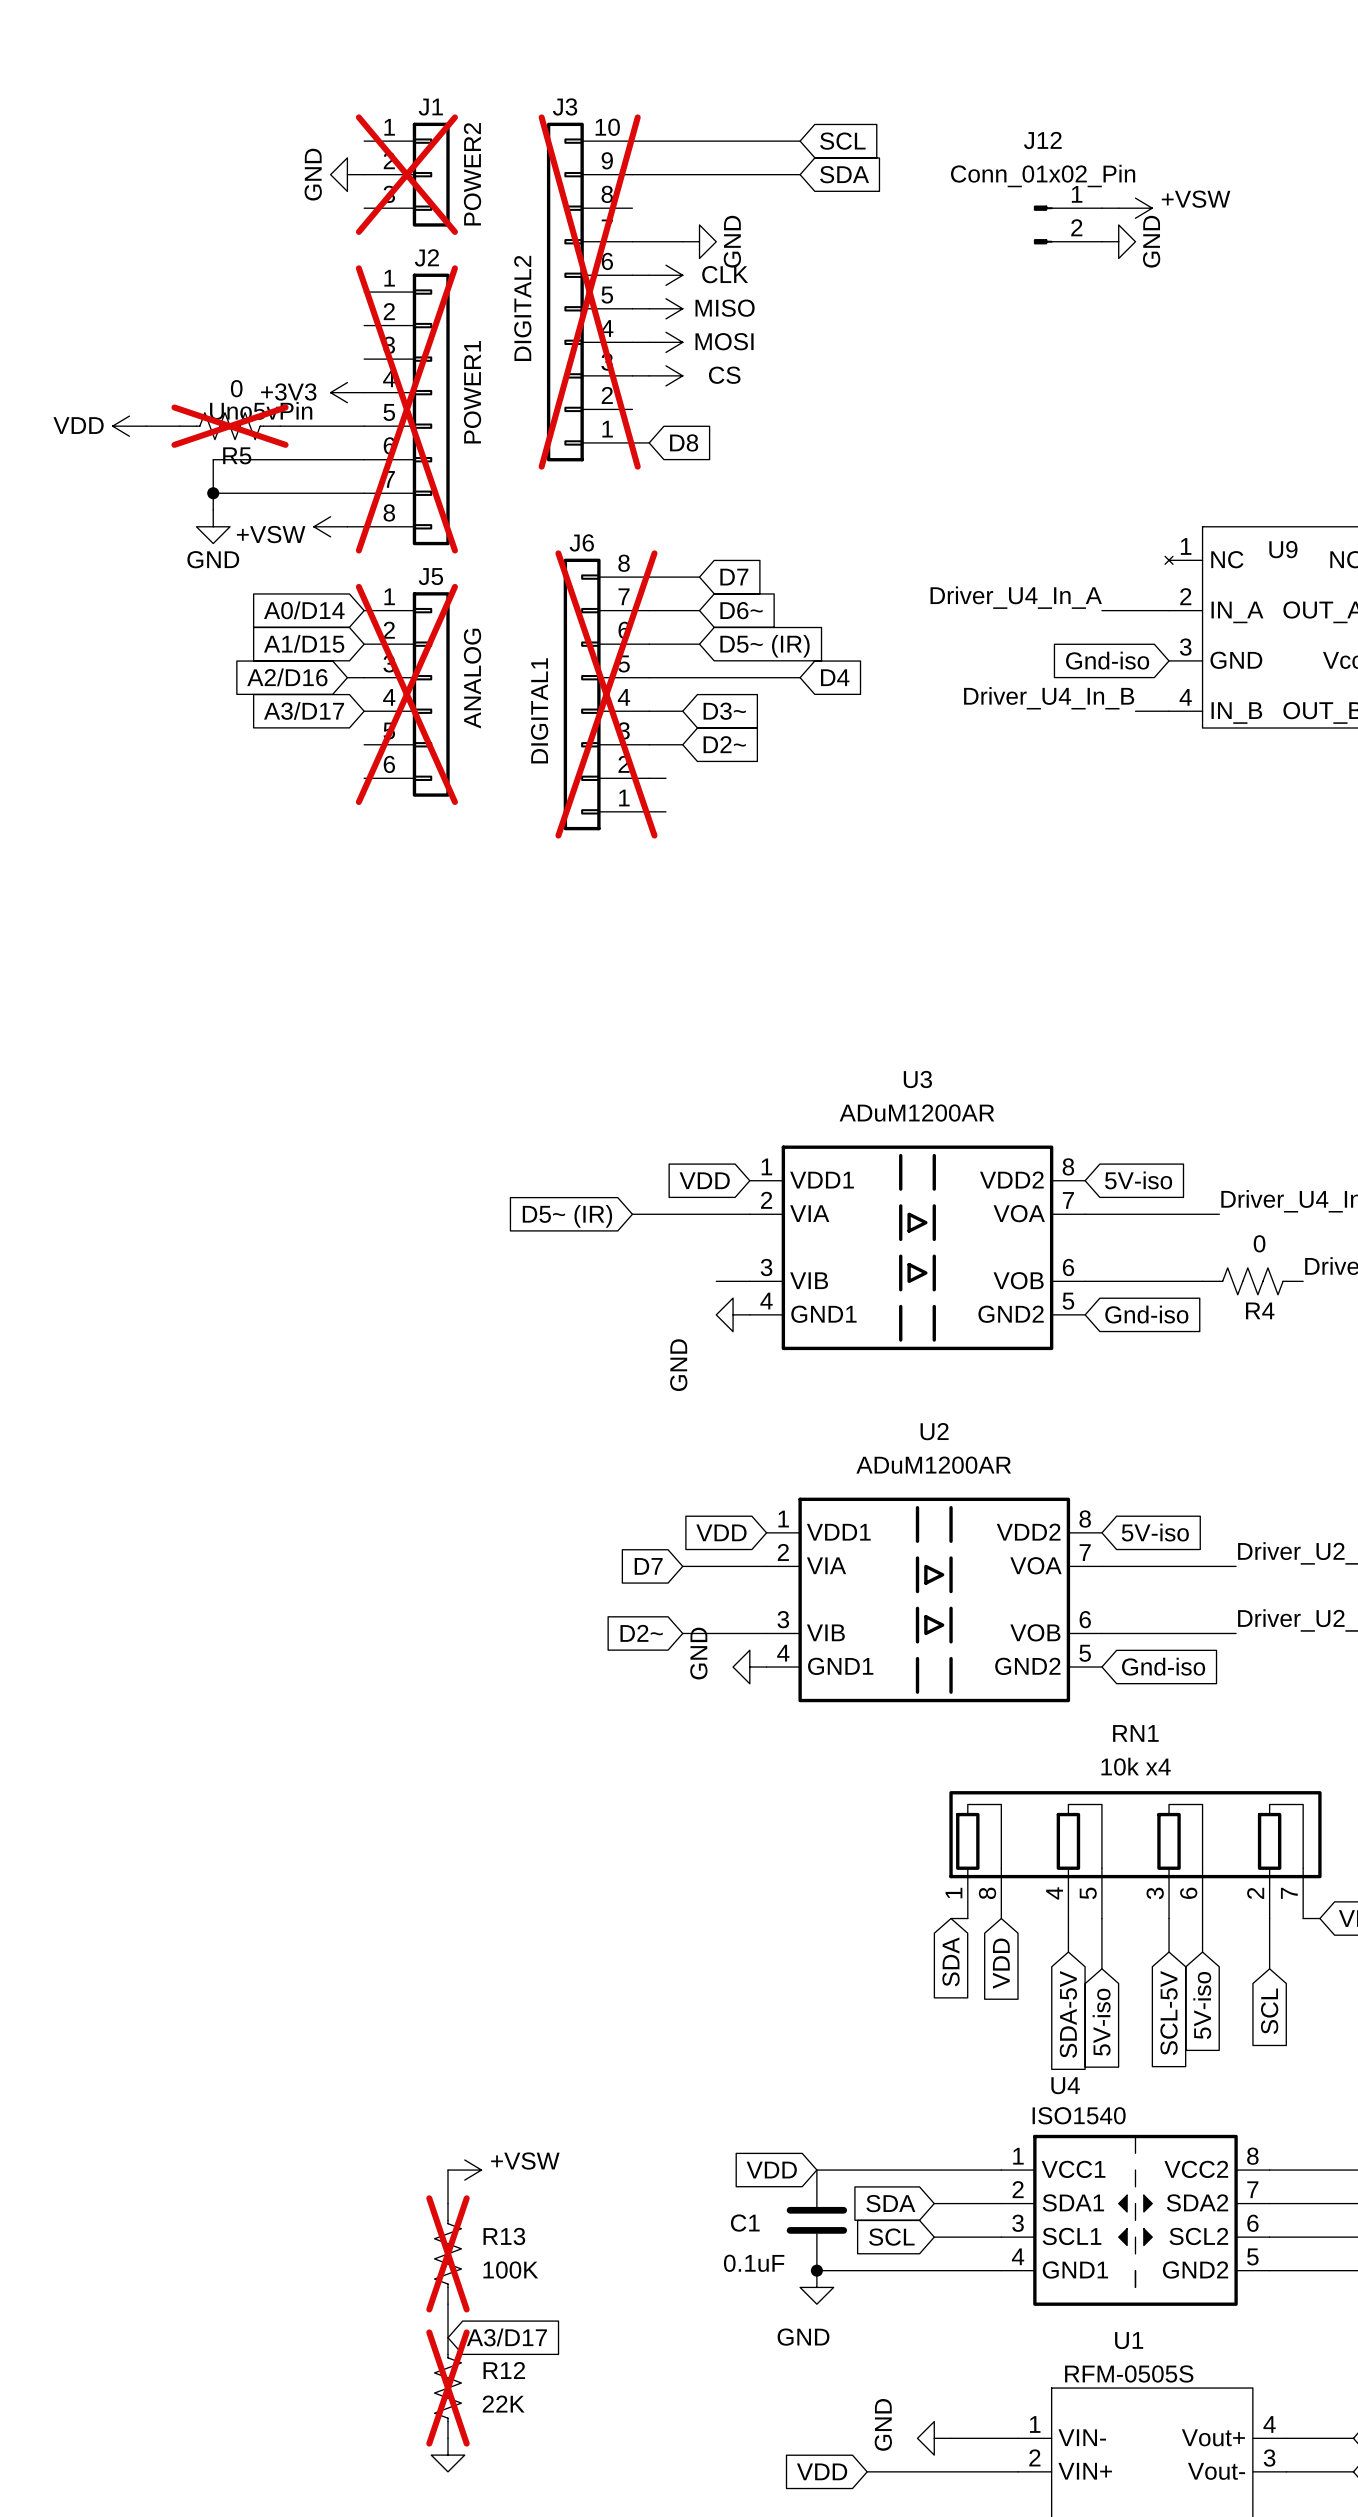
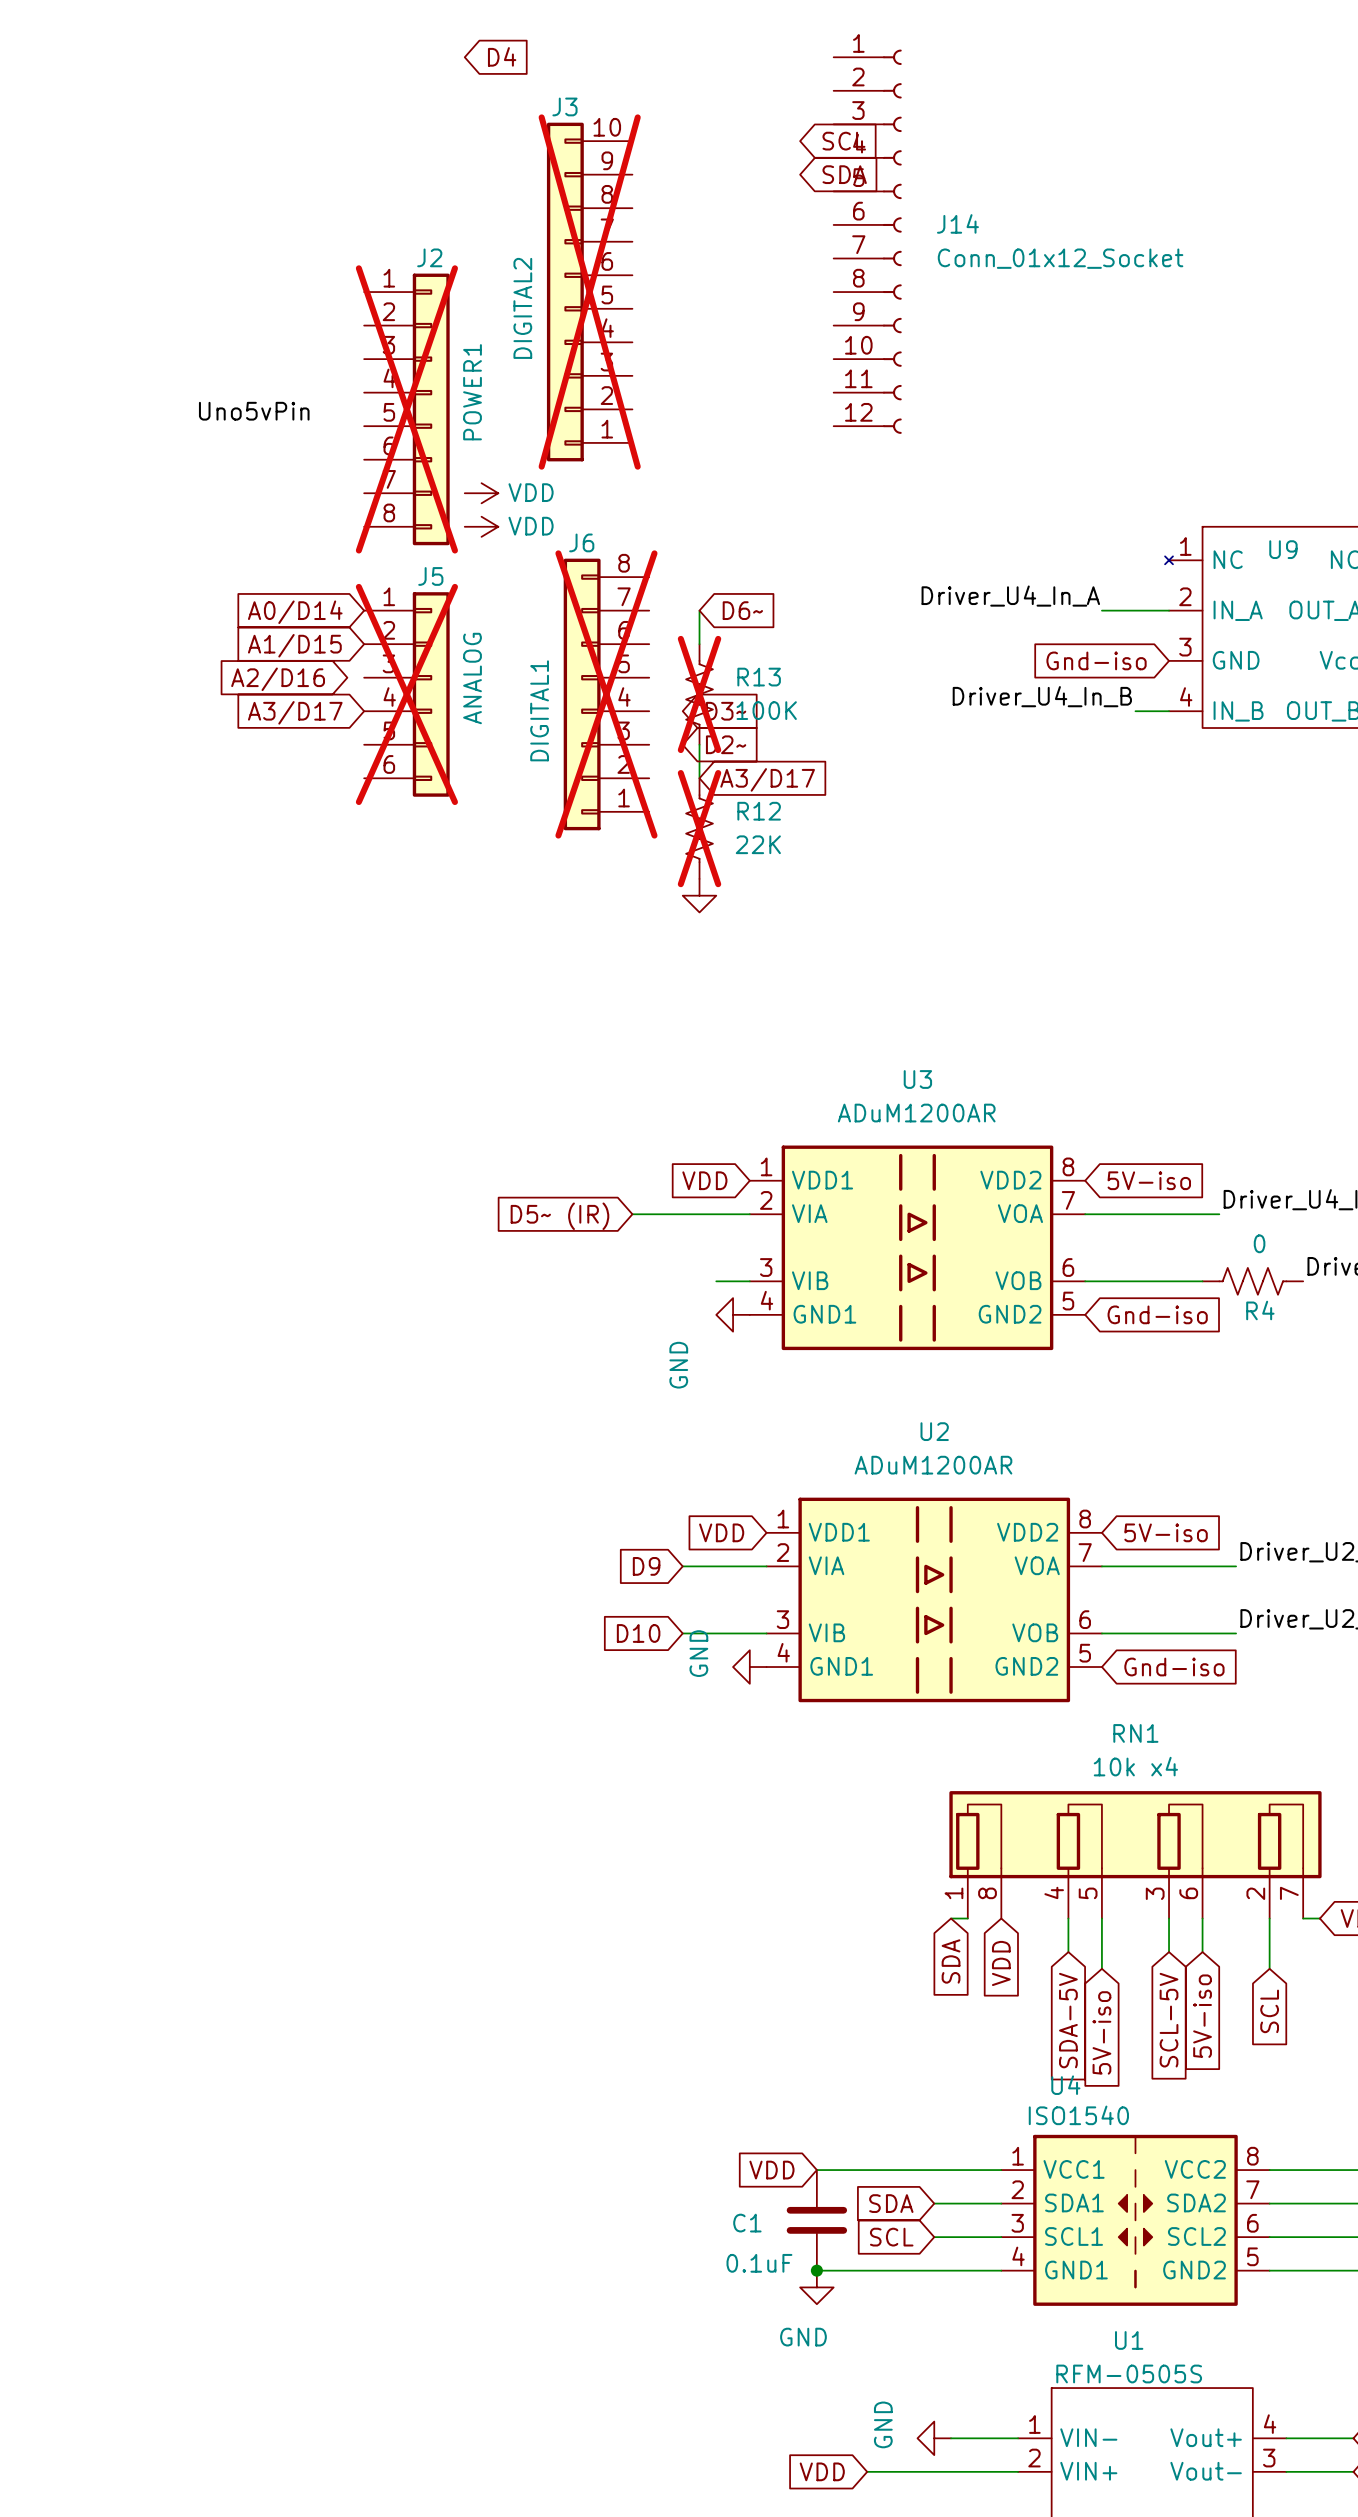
global label: none -> D4 (502, 56)
wire: (632, 141) (800, 141) -> none
power symbol: GND (347, 174) -> none
J1: POWER2 (406, 174) -> none
wire: (632, 174) (800, 174) -> none
wire: (1101, 208) (1118, 208) -> none
power symbol: +VSW (1135, 208) -> none
J12: Conn_01x02_Pin (1067, 224) -> none
wire: (632, 241) (682, 241) -> none
power symbol: GND (699, 241) -> none
J14: none -> Conn_01x12_Socket (867, 241)
power symbol: GND (1118, 241) -> none
wire: (632, 275) (649, 275) -> none
power symbol: CLK (665, 275) -> none
wire: (632, 308) (649, 308) -> none
power symbol: MISO (665, 308) -> none
wire: (632, 342) (649, 342) -> none
power symbol: MOSI (665, 342) -> none
wire: (632, 375) (649, 375) -> none
power symbol: CS (665, 375) -> none
power symbol: +3V3 (347, 392) -> none
power symbol: VDD (129, 426) -> none
wire: (146, 426) (179, 426) -> none
R5: 0 (230, 426) -> none
wire: (280, 426) (364, 426) -> none
wire: (632, 442) (649, 442) -> none
global label: D8 (684, 442) -> none
wire: (364, 459) (213, 459) (213, 510) -> none
wire: (213, 493) (364, 493) -> none
junction: (213, 493) -> none
power symbol: none -> VDD (481, 493)
power symbol: GND (213, 526) -> none
power symbol: +VSW (330, 526) -> none
wire: (347, 526) (364, 526) -> none
power symbol: none -> VDD (481, 526)
wire: (649, 577) (699, 577) -> none
global label: D7 (734, 577) -> none
wire: (649, 610) (699, 610) -> (699, 644) (699, 610)
wire: (649, 644) (699, 644) -> none
global label: D5~ (IR) (765, 646) -> none
wire: (347, 677) (364, 677) -> none
wire: (649, 677) (800, 677) -> none
global label: D4 (835, 677) -> none
wire: (649, 711) (682, 711) -> none
wire: (649, 744) (682, 744) -> none
wire: none -> (699, 744) (699, 778)
global label: none -> A3/D17 (767, 779)
wire: (649, 778) (665, 778) -> none
wire: (649, 811) (665, 811) -> none
power symbol: none -> (699, 895)
global label: D7 (648, 1566) -> D9 (646, 1566)
global label: D2~ (641, 1633) -> D10 (638, 1633)
wire: (447, 2170) (447, 2203) -> none
power symbol: +VSW (464, 2170) -> none
R13 position: (447, 2253) -> (699, 694)
wire: (447, 2304) (447, 2337) -> none
global label: A3/D17 (506, 2337) -> none
R12 position: (447, 2388) -> (699, 828)
power symbol: (447, 2455) -> none

